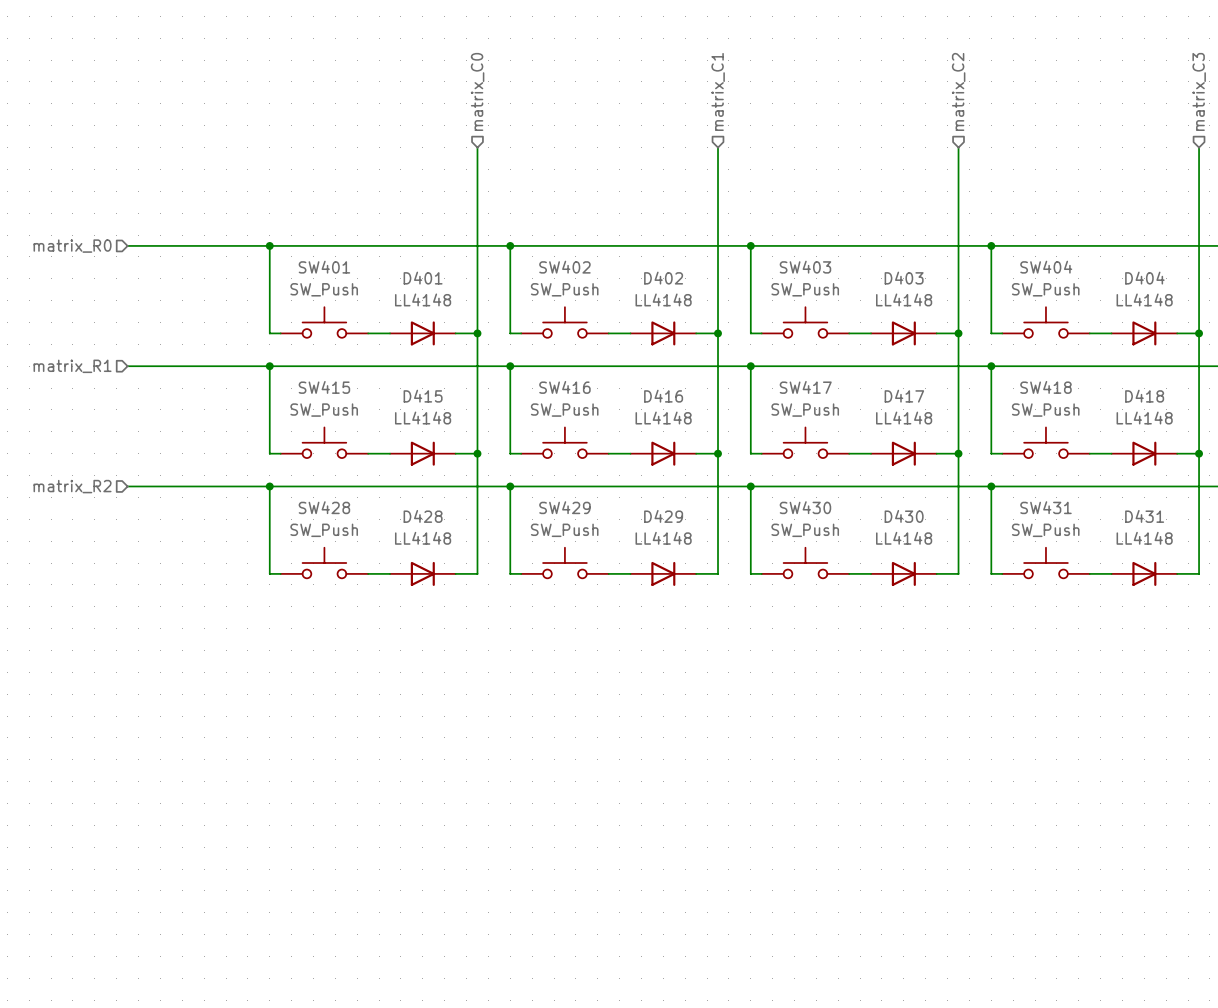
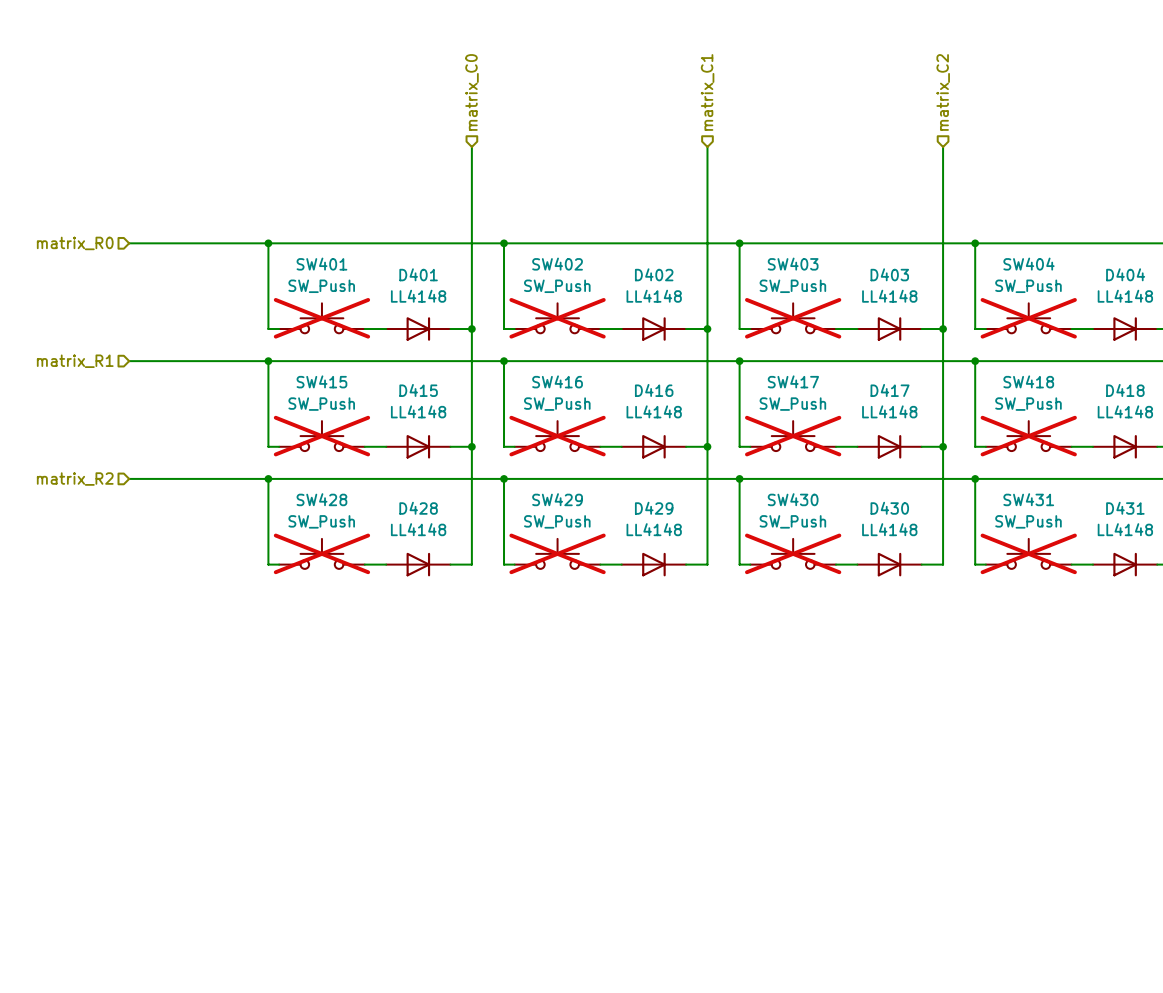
SW401 do-not-place cross: none -> (321, 318)
SW402 do-not-place cross: none -> (557, 318)
SW403 do-not-place cross: none -> (793, 318)
SW404 do-not-place cross: none -> (1028, 318)
SW415 do-not-place cross: none -> (321, 436)
SW416 do-not-place cross: none -> (557, 436)
SW417 do-not-place cross: none -> (793, 436)
SW418 do-not-place cross: none -> (1028, 436)
SW428 do-not-place cross: none -> (321, 553)
SW429 do-not-place cross: none -> (557, 553)
SW430 do-not-place cross: none -> (793, 553)
SW431 do-not-place cross: none -> (1028, 553)

